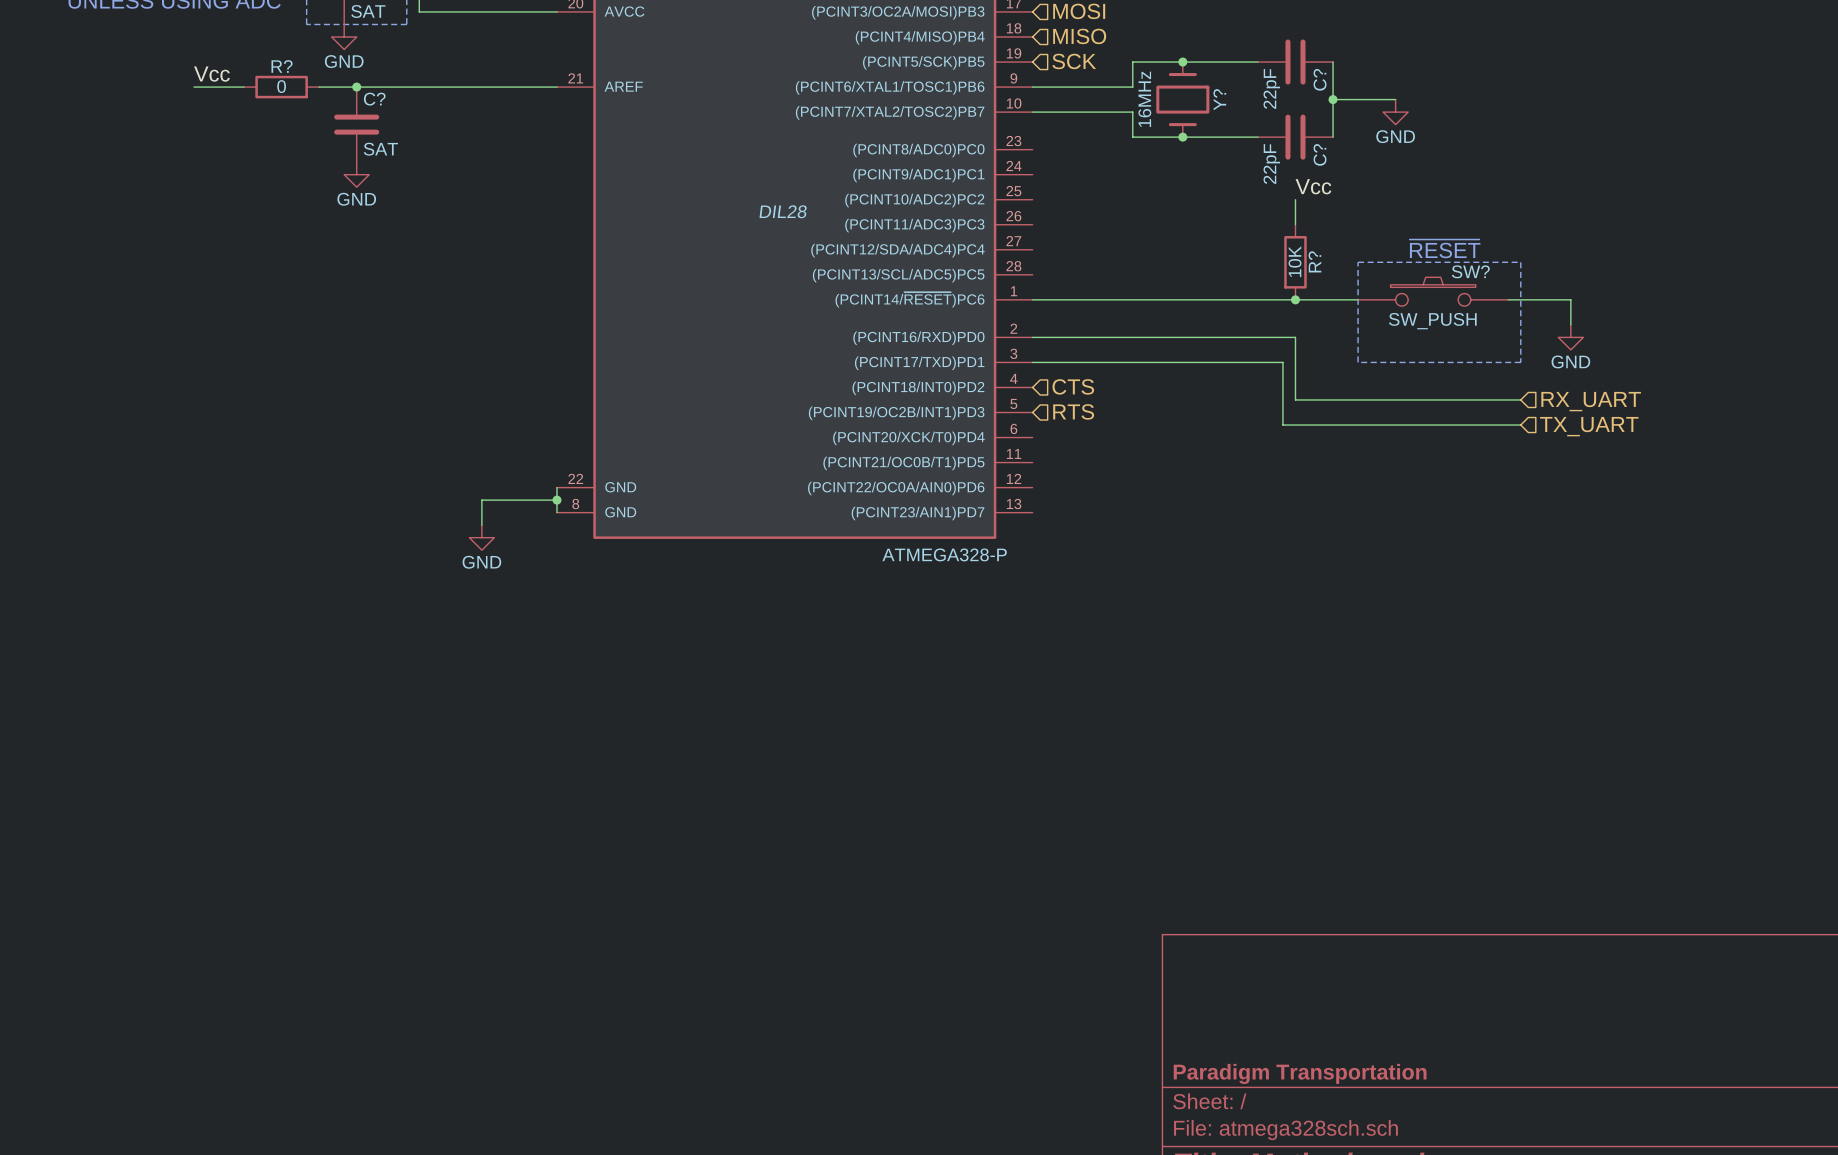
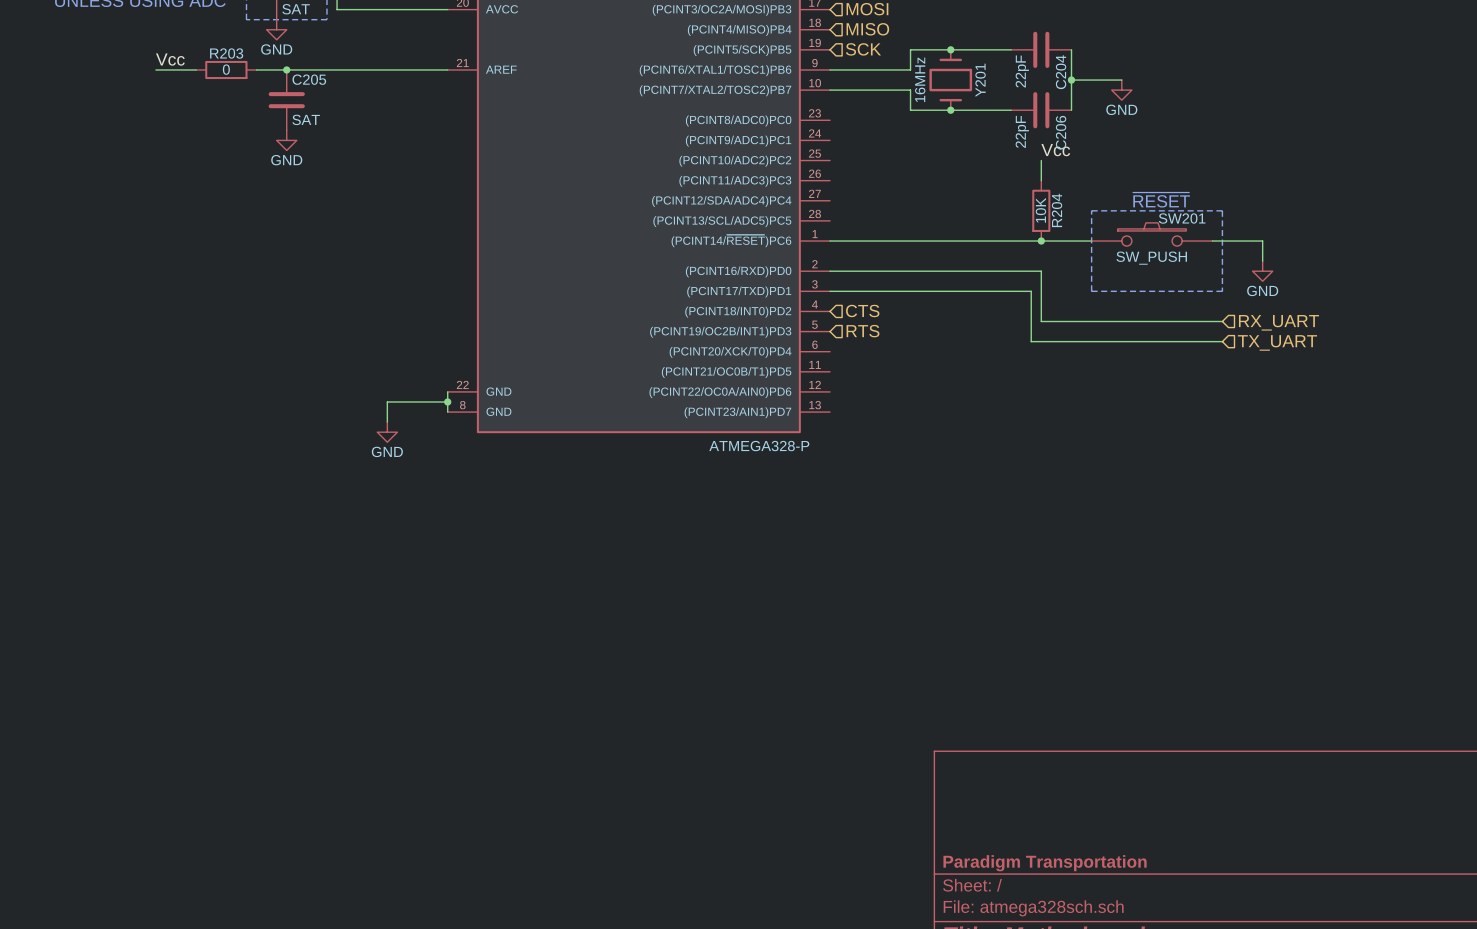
R? name: R? (282, 66) -> R203 (226, 53)
C? name: C? (1320, 79) -> C204 (1061, 72)
C? name: C? (374, 99) -> C205 (309, 79)
Y? name: Y? (1219, 99) -> Y201 (980, 80)
C? name: C? (1320, 154) -> C206 (1061, 132)
part text: DIL28 (783, 211) -> none
R? name: R? (1314, 261) -> R204 (1057, 210)
SW? name: SW? (1470, 271) -> SW201 (1182, 218)

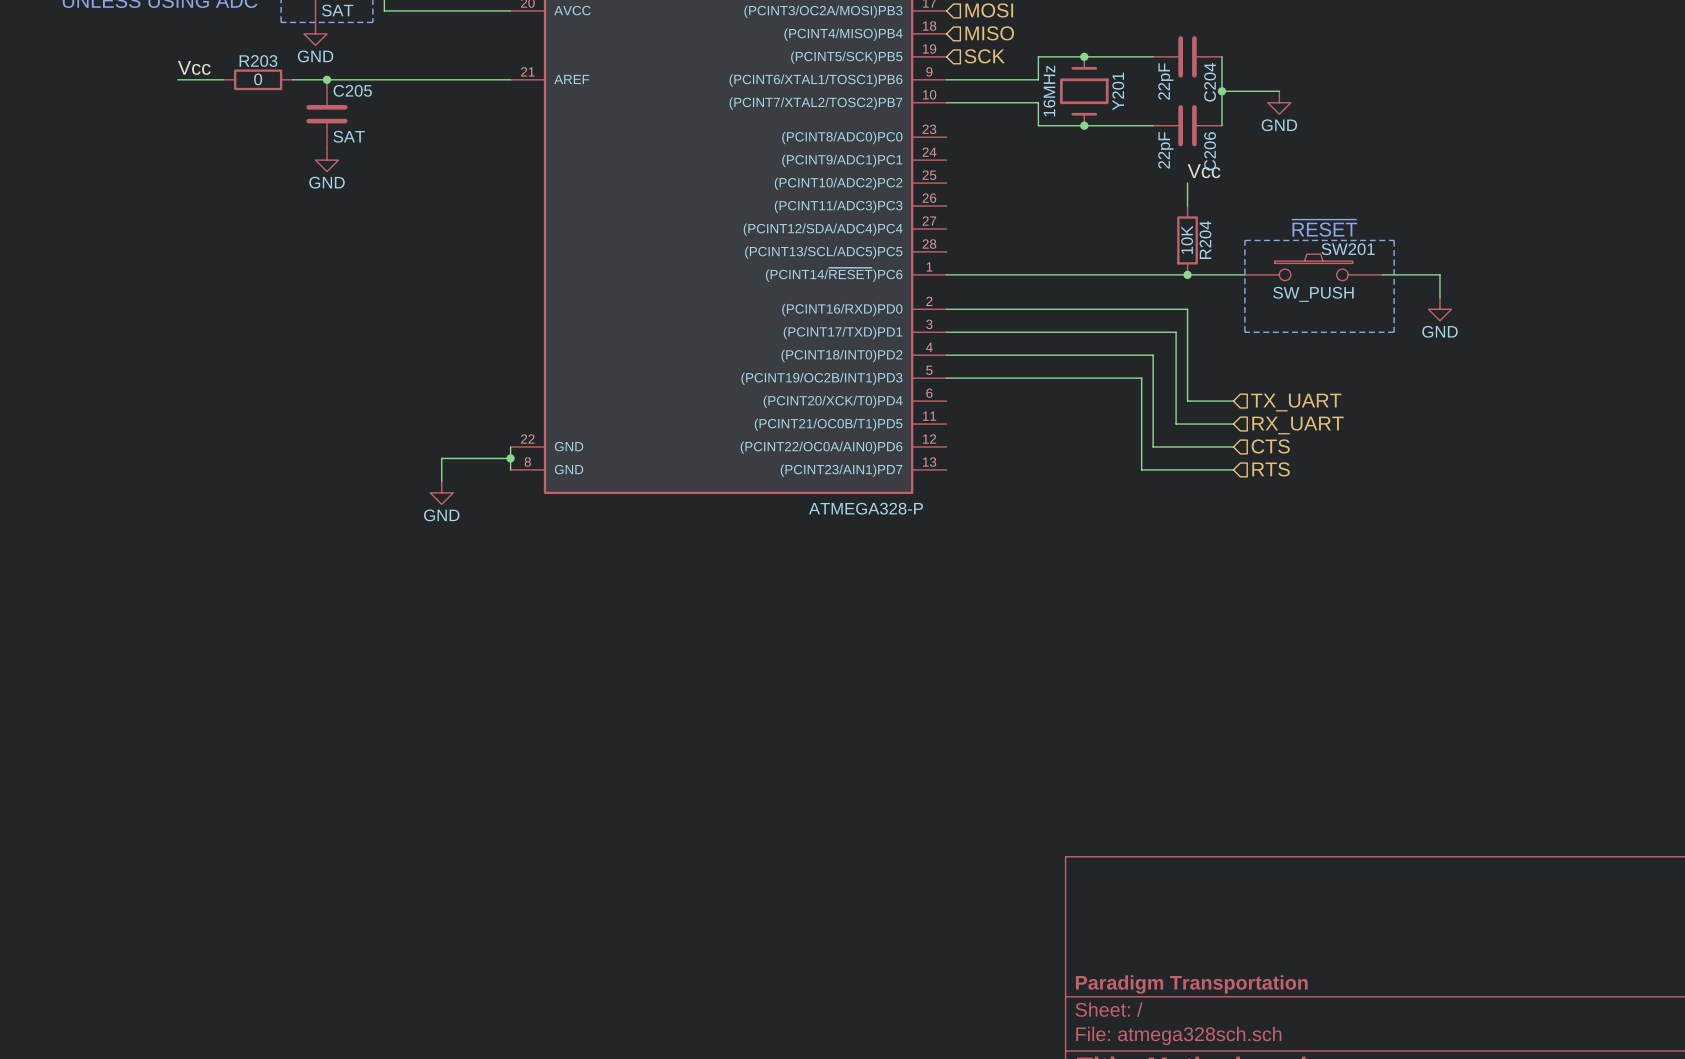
hierarchical label: CTS (862, 310) -> none
wire: none -> (946, 355) (1153, 355) (1153, 446) (1233, 446)
wire: (1041, 321) (1222, 321) -> (1187, 366) (1187, 401) (1233, 401)
hierarchical label position: RX_UART (1278, 322) -> RX_UART (1297, 425)
wire: none -> (946, 378) (1141, 378) (1141, 469) (1233, 469)
hierarchical label: RTS (862, 331) -> none
wire: (1031, 341) (1222, 341) -> (1176, 389) (1176, 424) (1233, 424)
hierarchical label position: TX_UART (1277, 342) -> TX_UART (1296, 402)
hierarchical label: none -> CTS (1270, 446)
hierarchical label: none -> RTS (1271, 469)

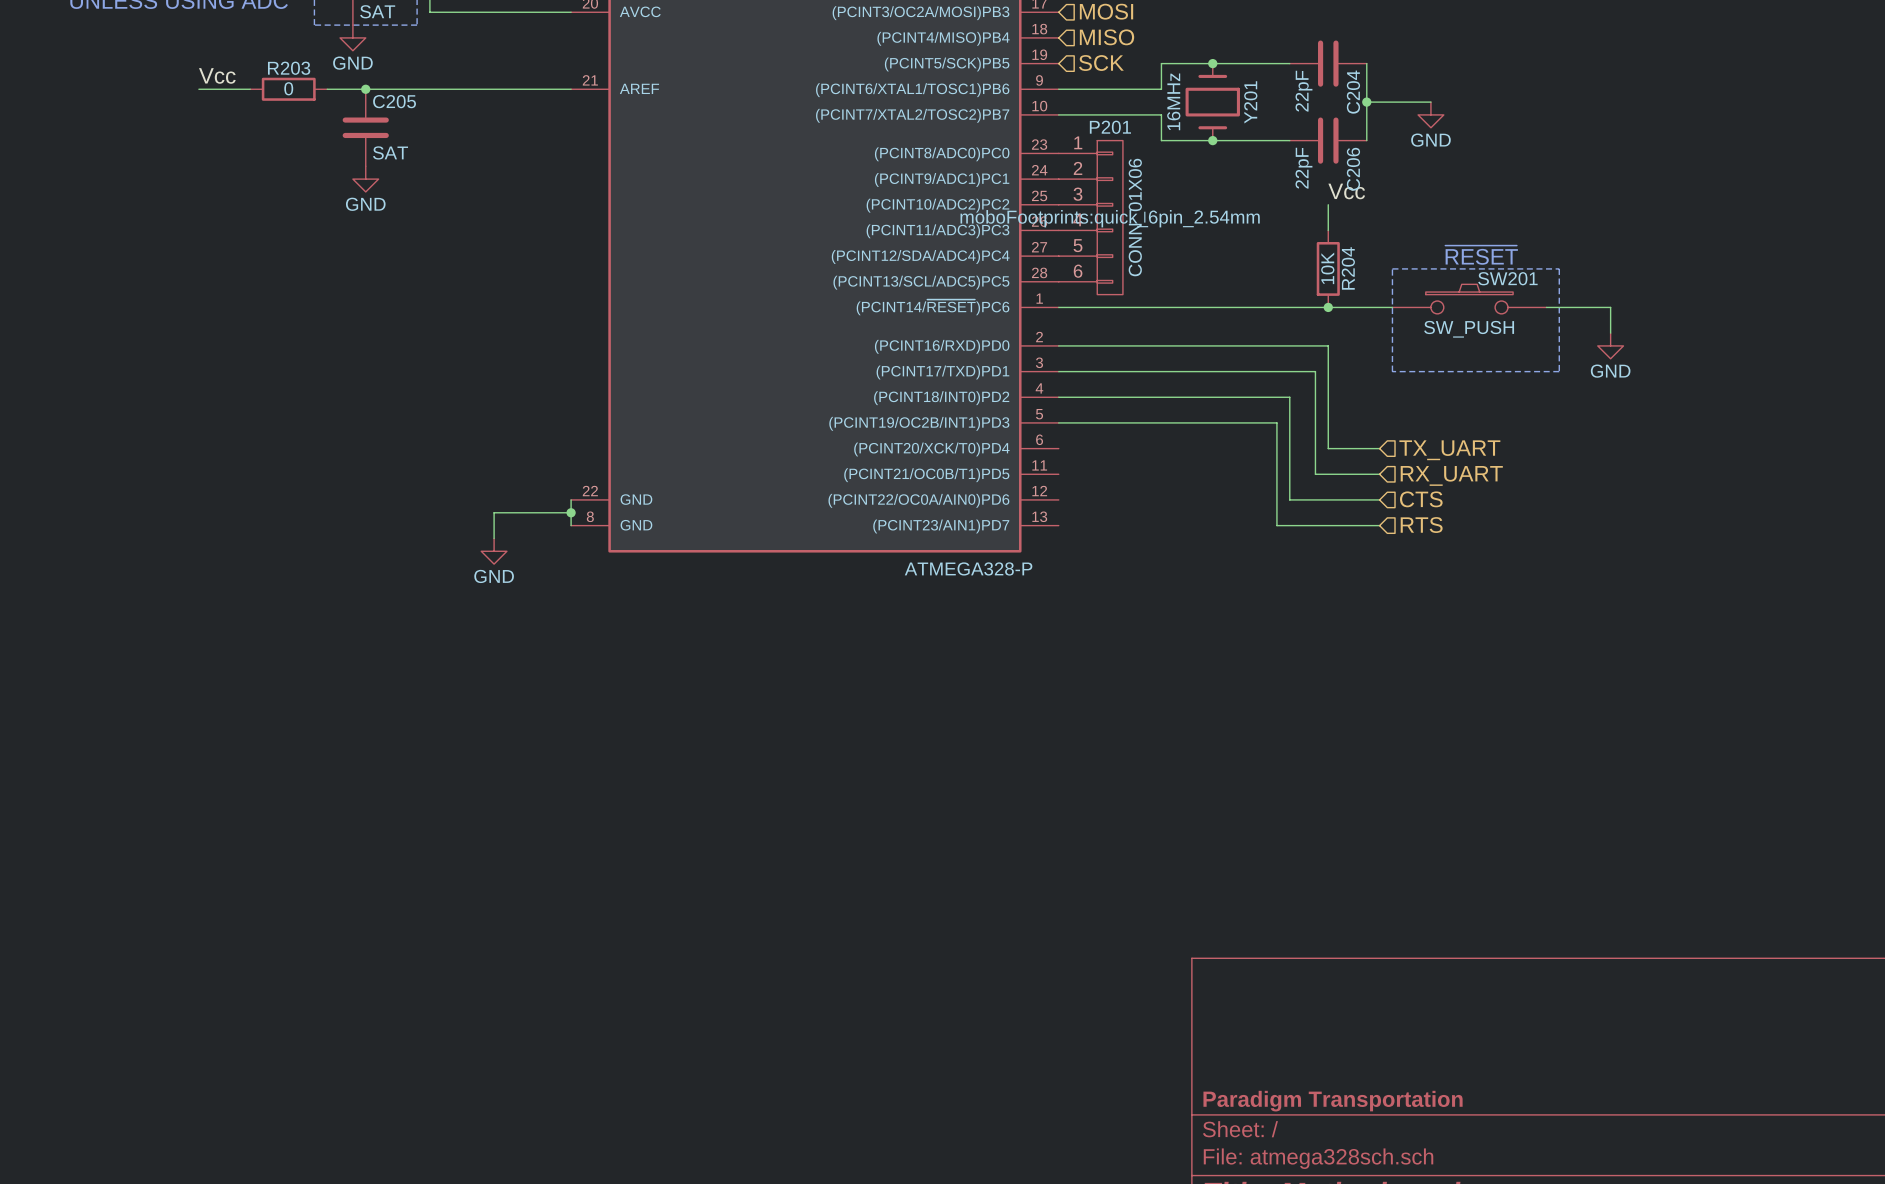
P201: none -> CONN_01X06 (1090, 217)

